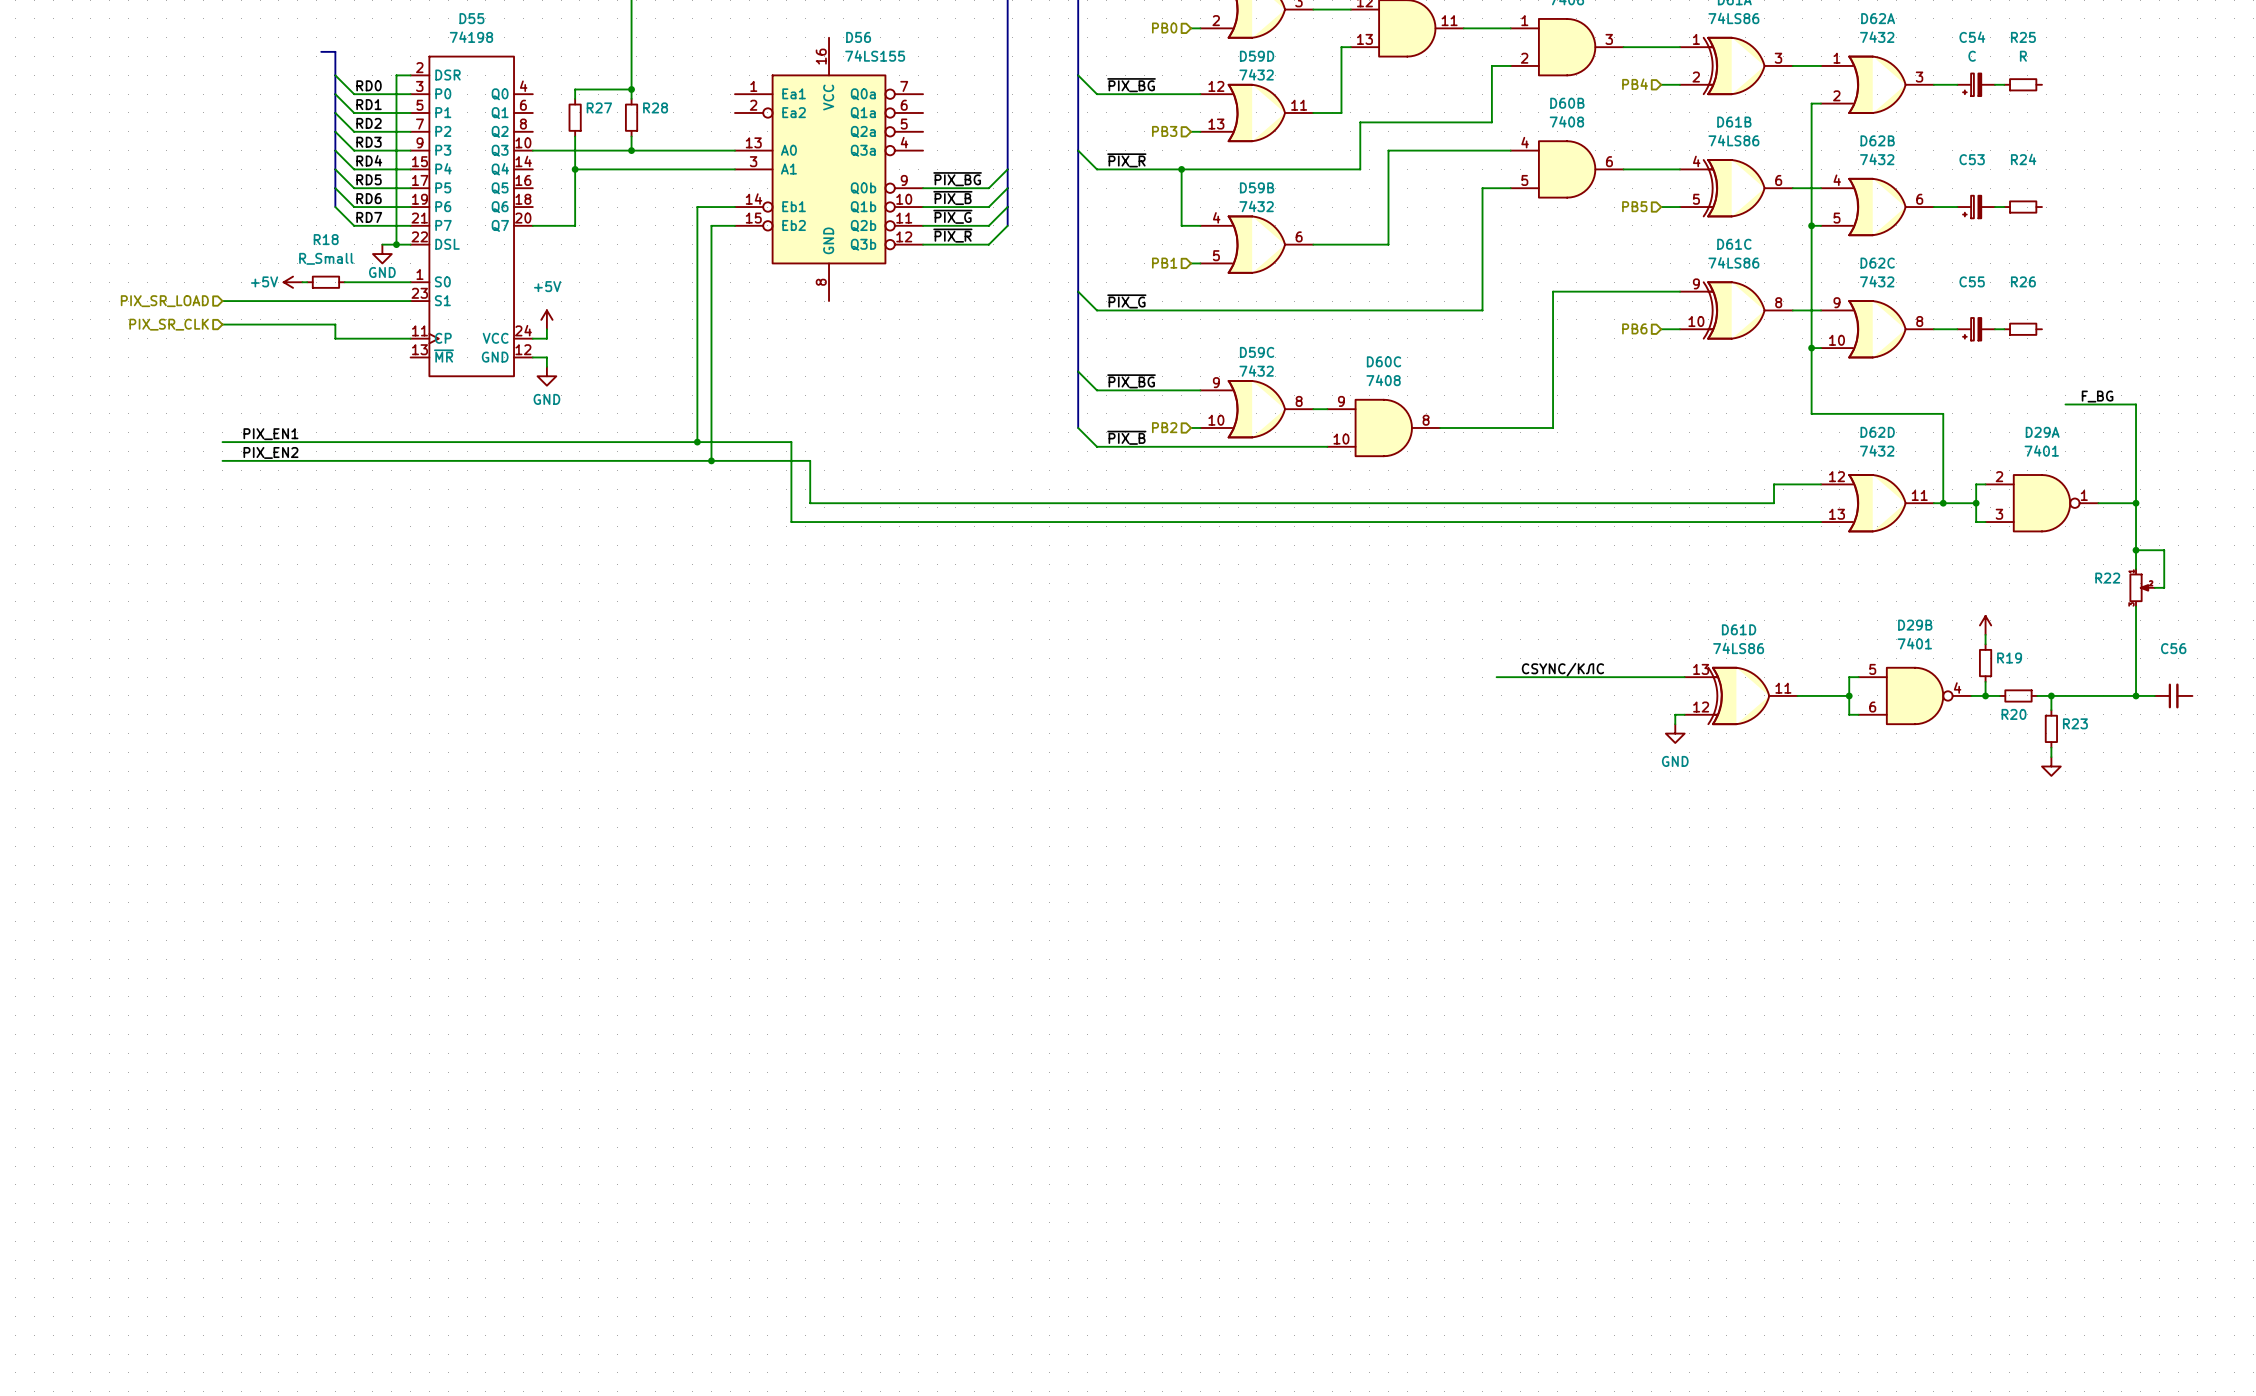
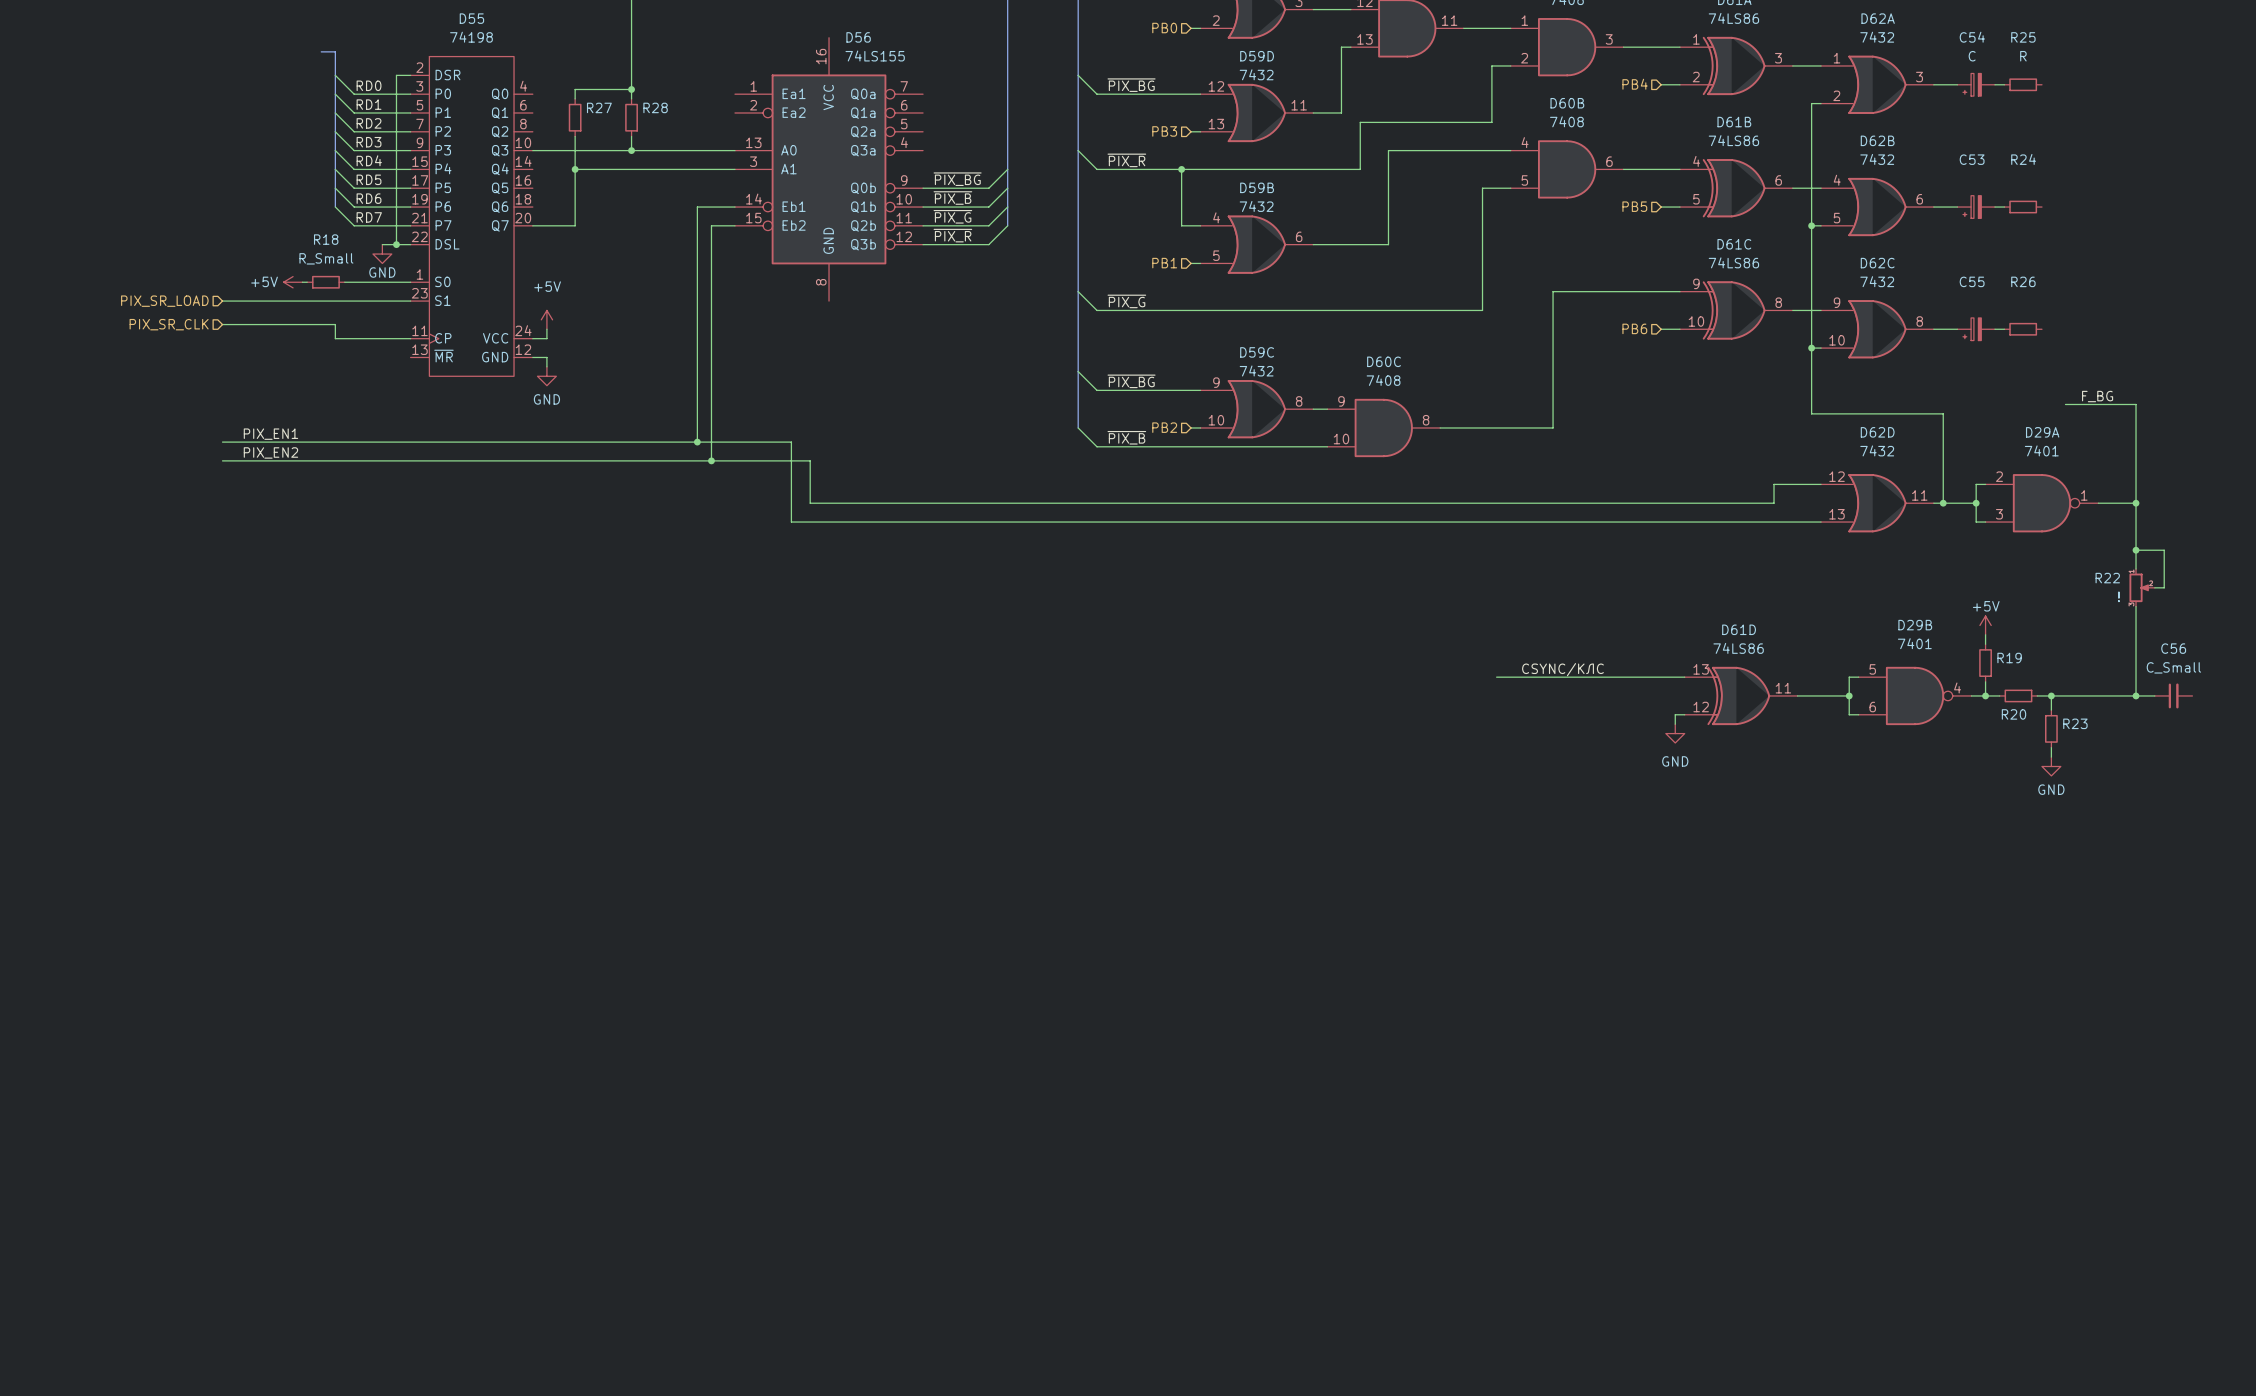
R22 value: none -> ! (2118, 596)
power symbol text: none -> +5V (1986, 606)
C56 value: none -> C_Small (2173, 667)
power symbol text: none -> GND (2051, 789)

